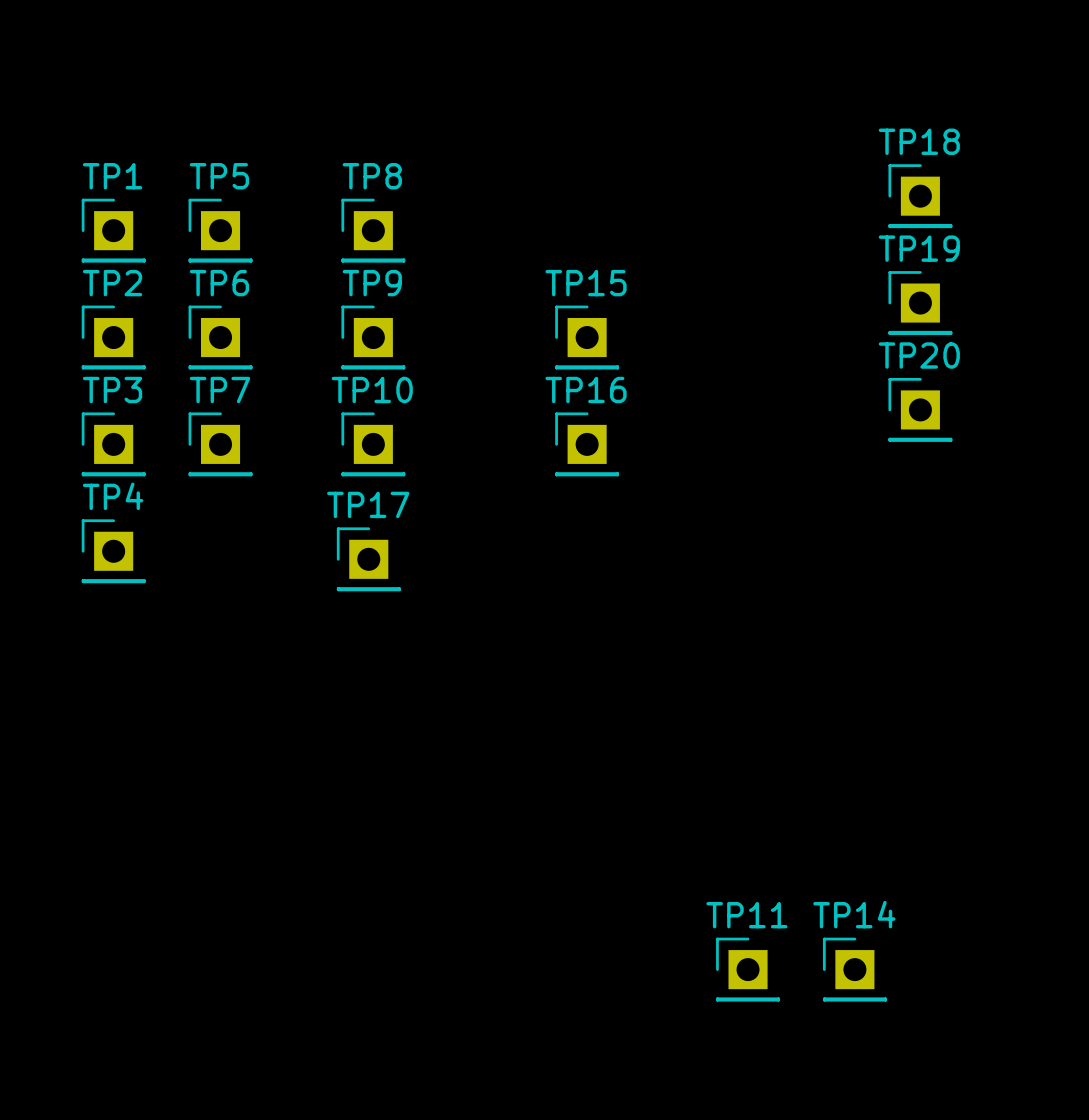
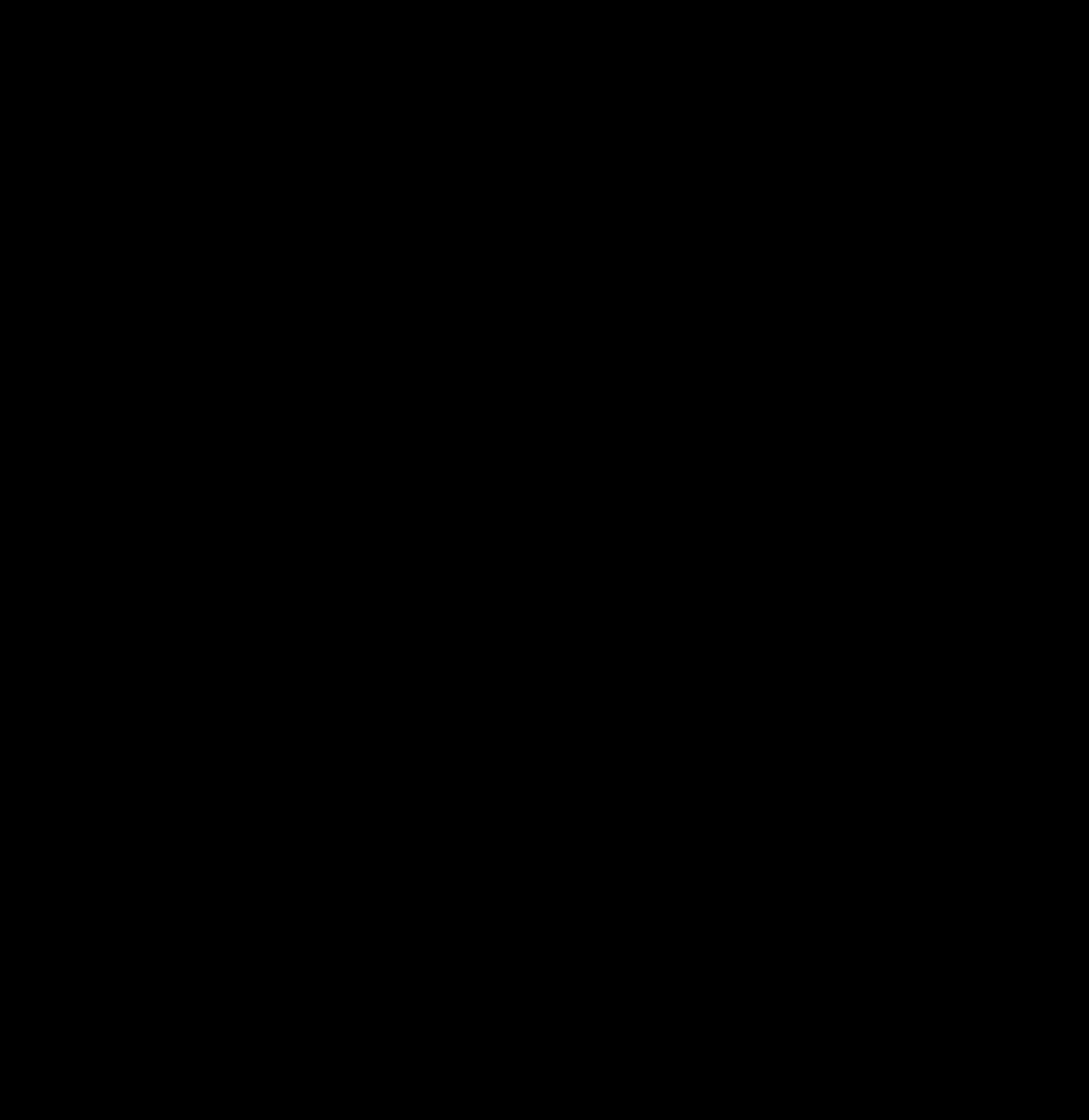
TP18: (920, 196) -> none
TP1: (113, 230) -> none
TP5: (220, 230) -> none
TP8: (373, 230) -> none
TP19: (920, 303) -> none
TP2: (113, 337) -> none
TP6: (220, 337) -> none
TP9: (373, 337) -> none
TP15: (587, 337) -> none
TP20: (920, 409) -> none
TP3: (113, 444) -> none
TP7: (220, 444) -> none
TP10: (373, 444) -> none
TP16: (587, 444) -> none
TP4: (113, 551) -> none
TP17: (368, 559) -> none
TP11: (748, 969) -> none
TP14: (854, 969) -> none

